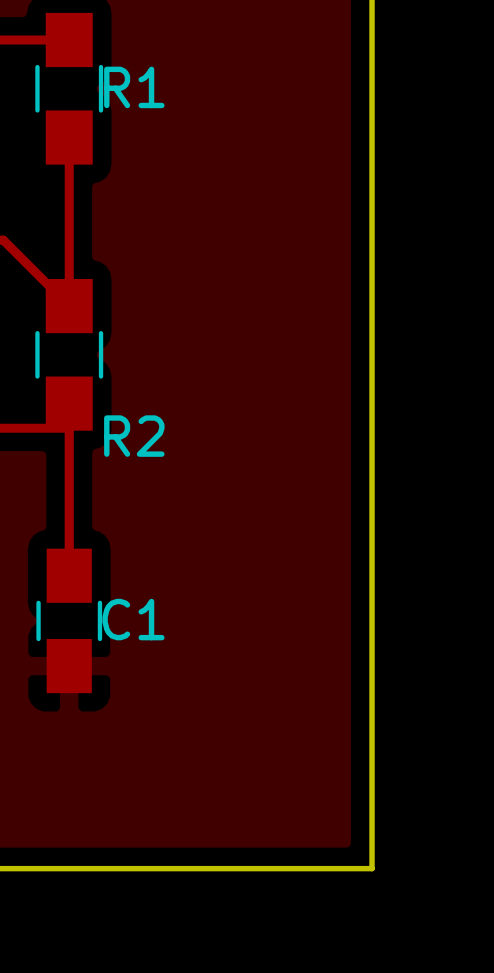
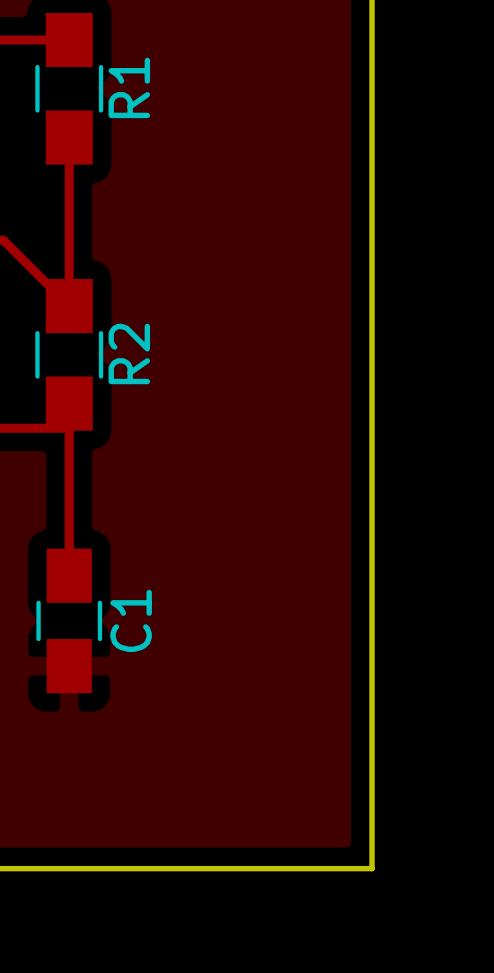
R1 name rotation: 0° (134, 87) -> 90° counterclockwise (129, 87)
R2 name rotation: 0° (134, 436) -> 90° counterclockwise (129, 353)
C1 name rotation: 0° (133, 619) -> 90° counterclockwise (131, 620)

